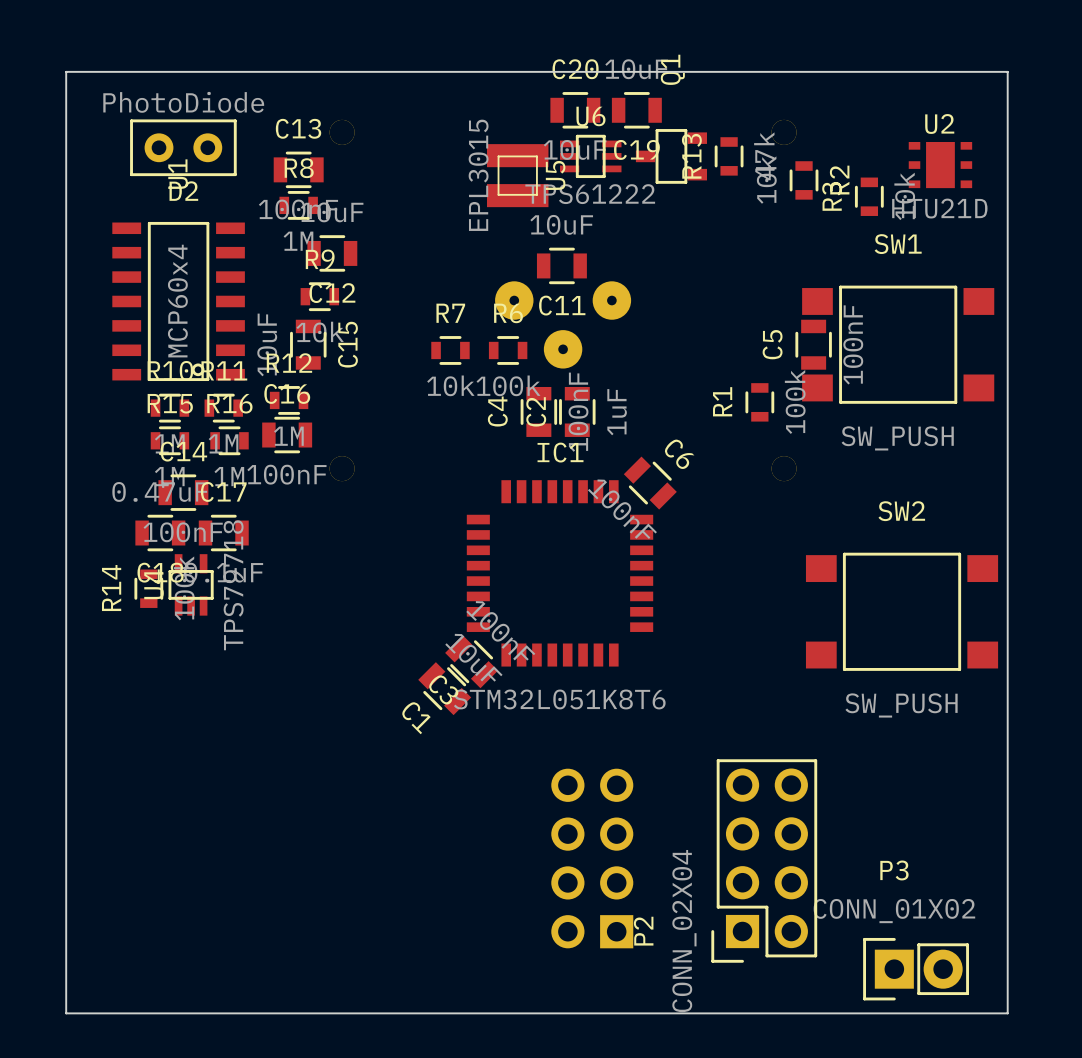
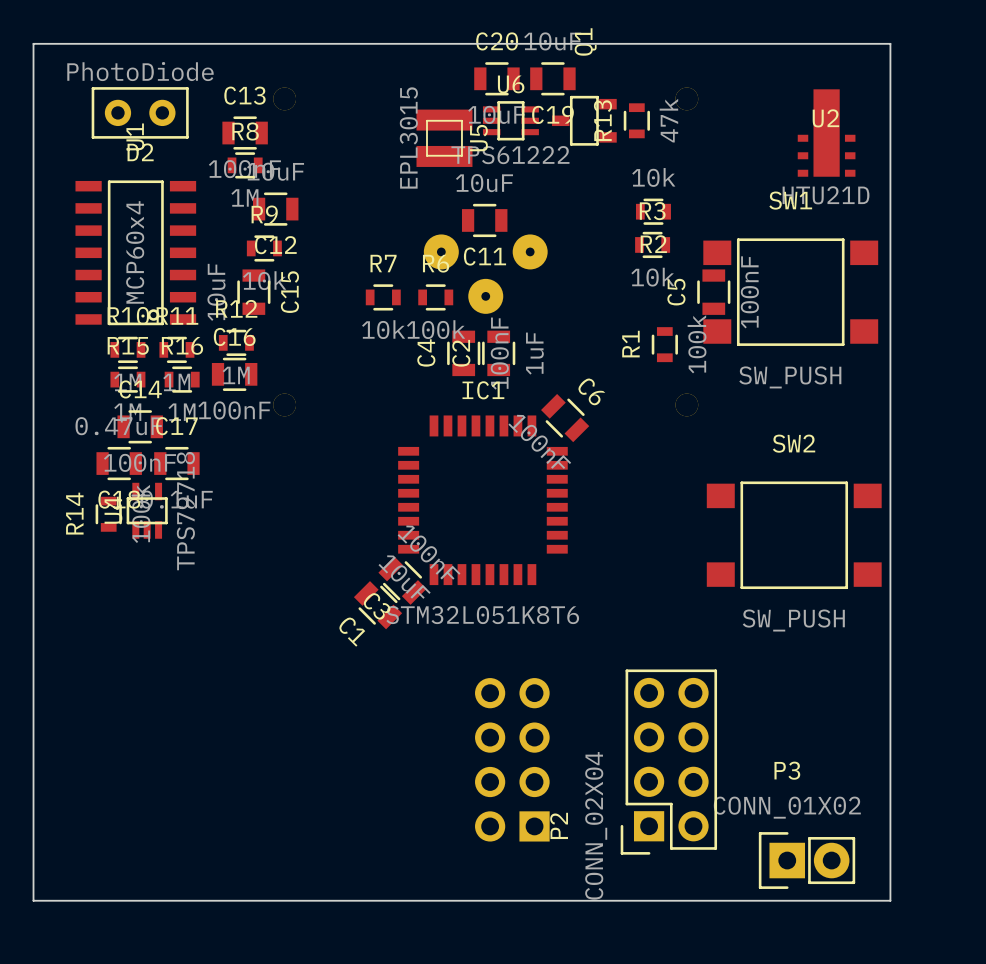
U2 footprint: [908, 142, 973, 189] -> [797, 89, 856, 177]
R2 rotation: 0° (804, 180) -> 90° clockwise (653, 211)
R2 position: (804, 180) -> (653, 211)
R3 rotation: 0° (869, 196) -> 90° clockwise (652, 244)
R3 position: (869, 196) -> (652, 244)

